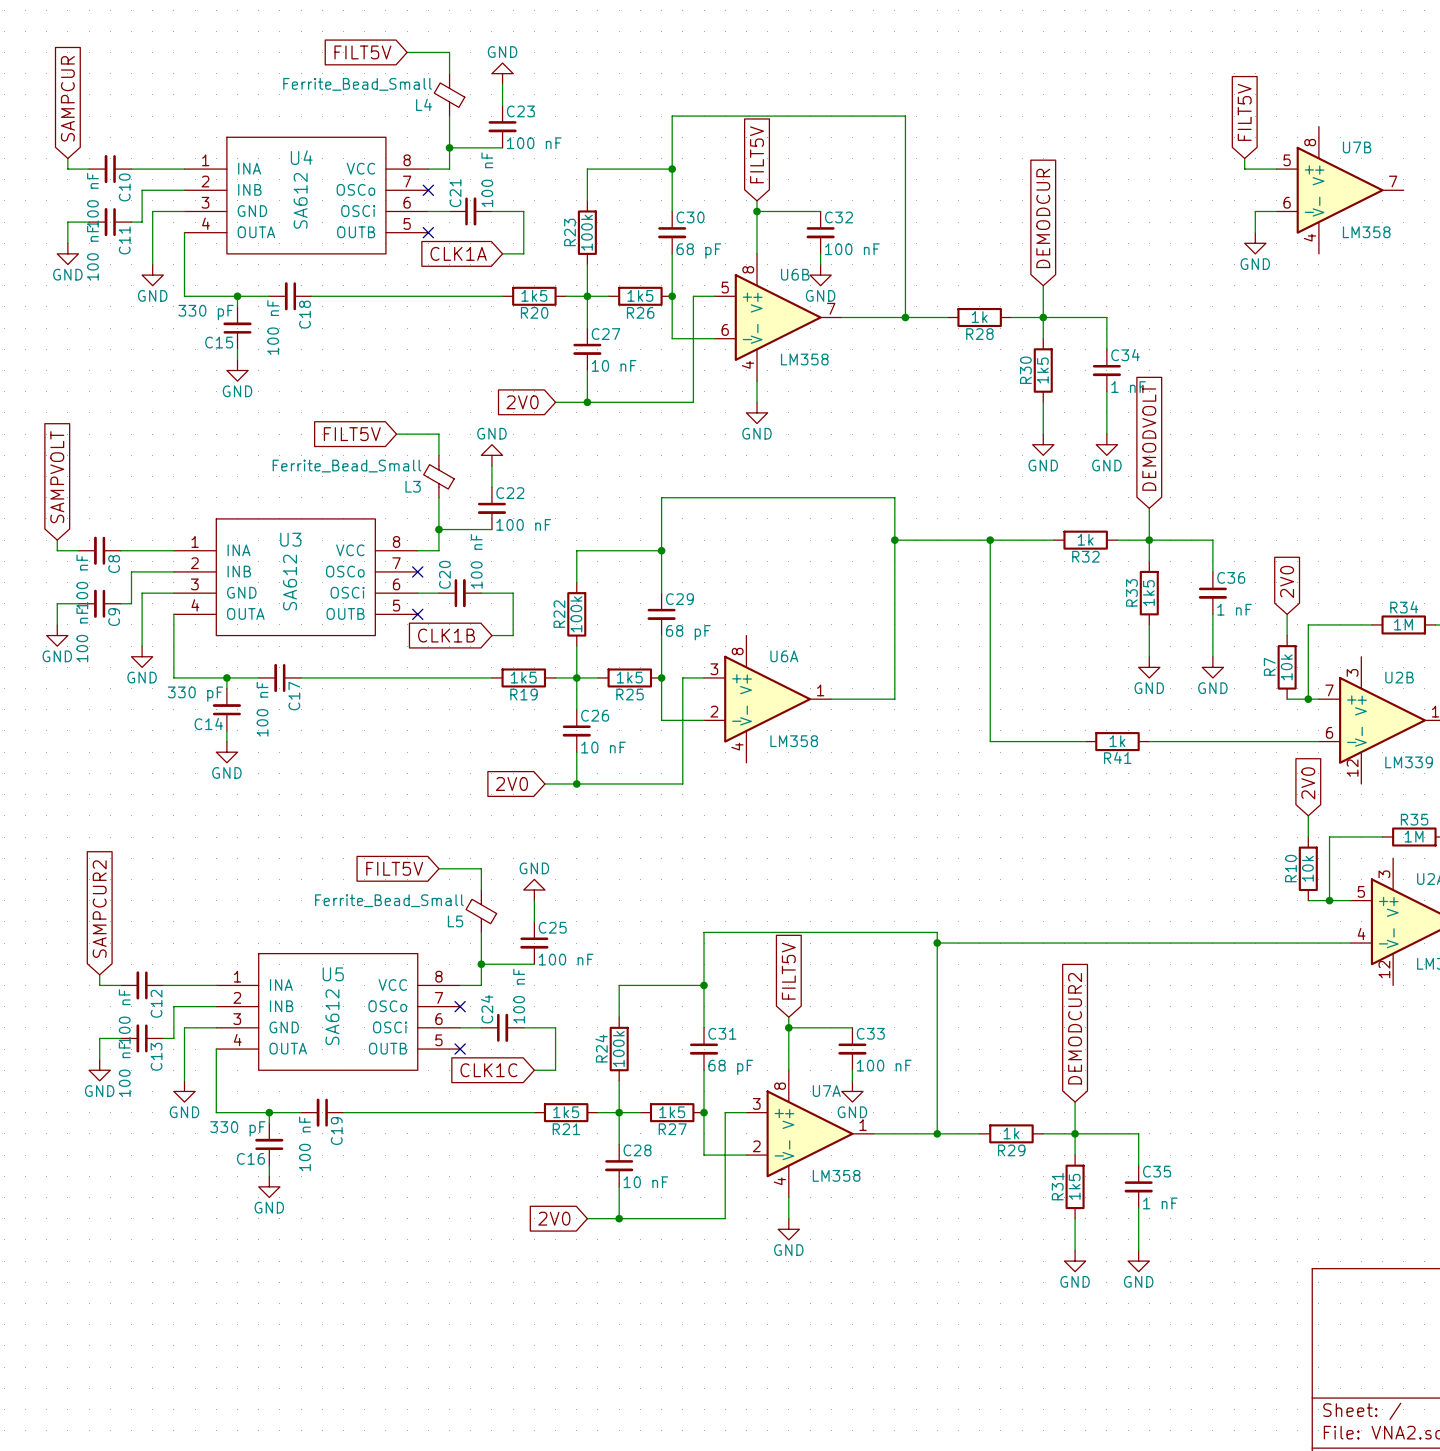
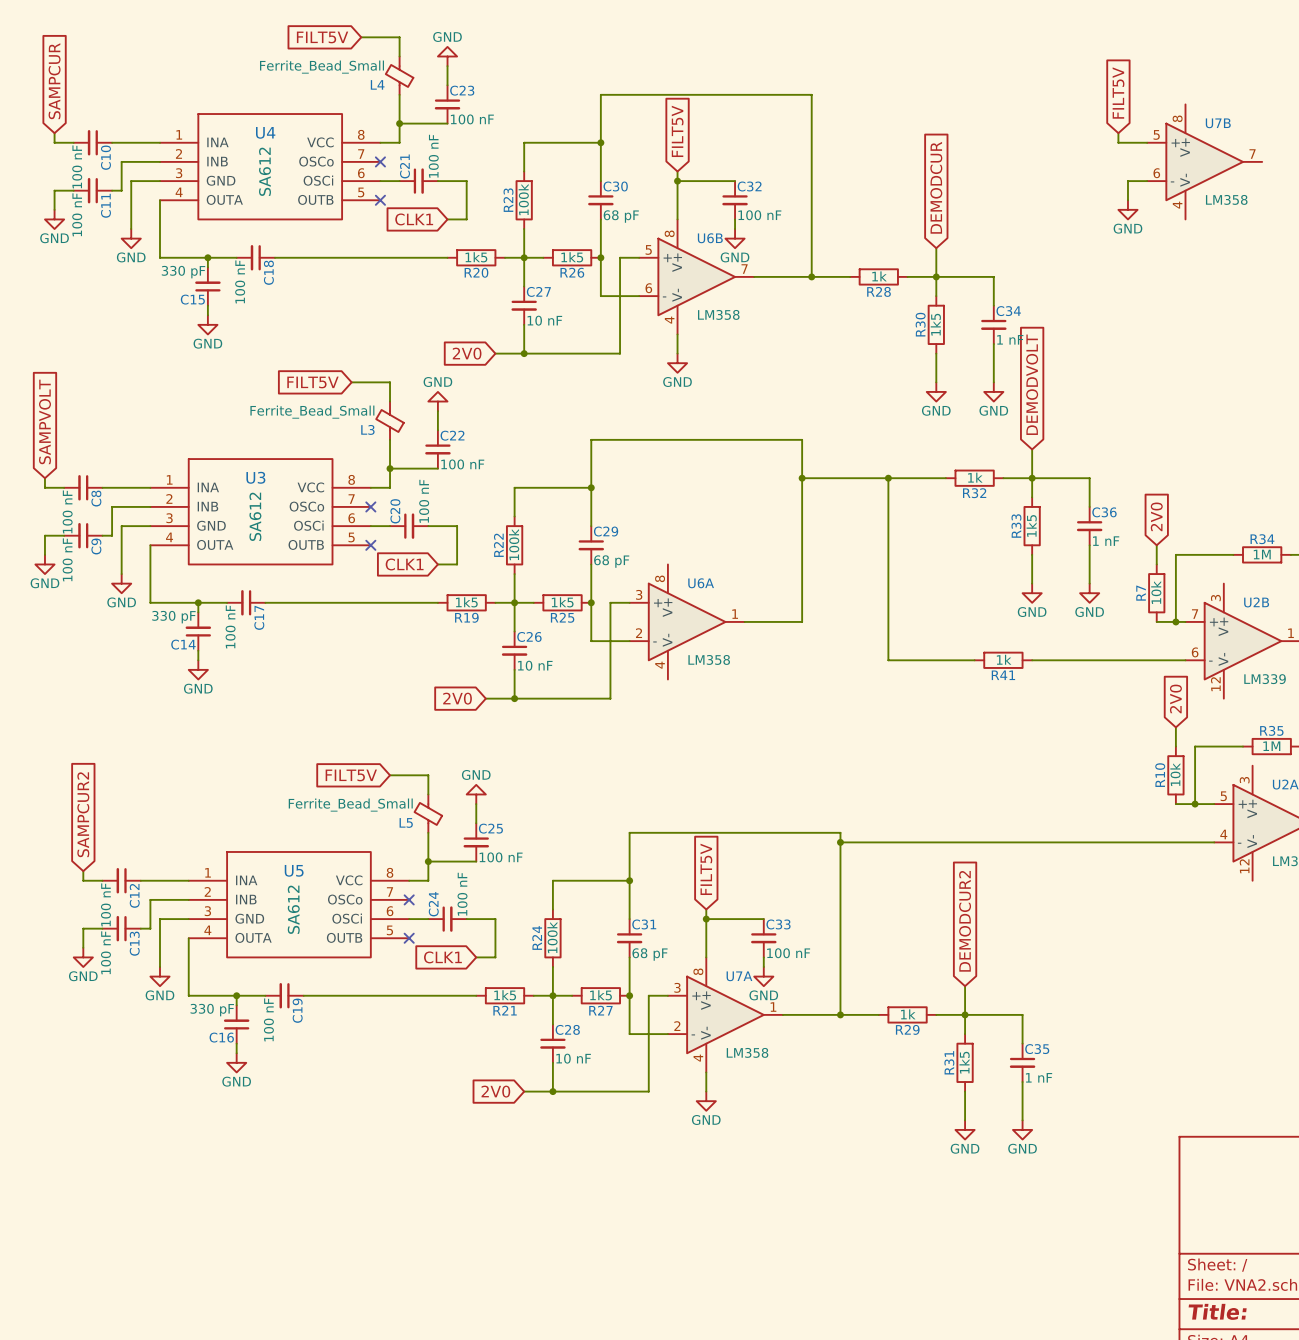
global label: CLK1A (458, 253) -> CLK1 (414, 219)
global label: CLK1B (446, 635) -> CLK1 (404, 564)
global label: CLK1C (488, 1070) -> CLK1 (442, 957)

